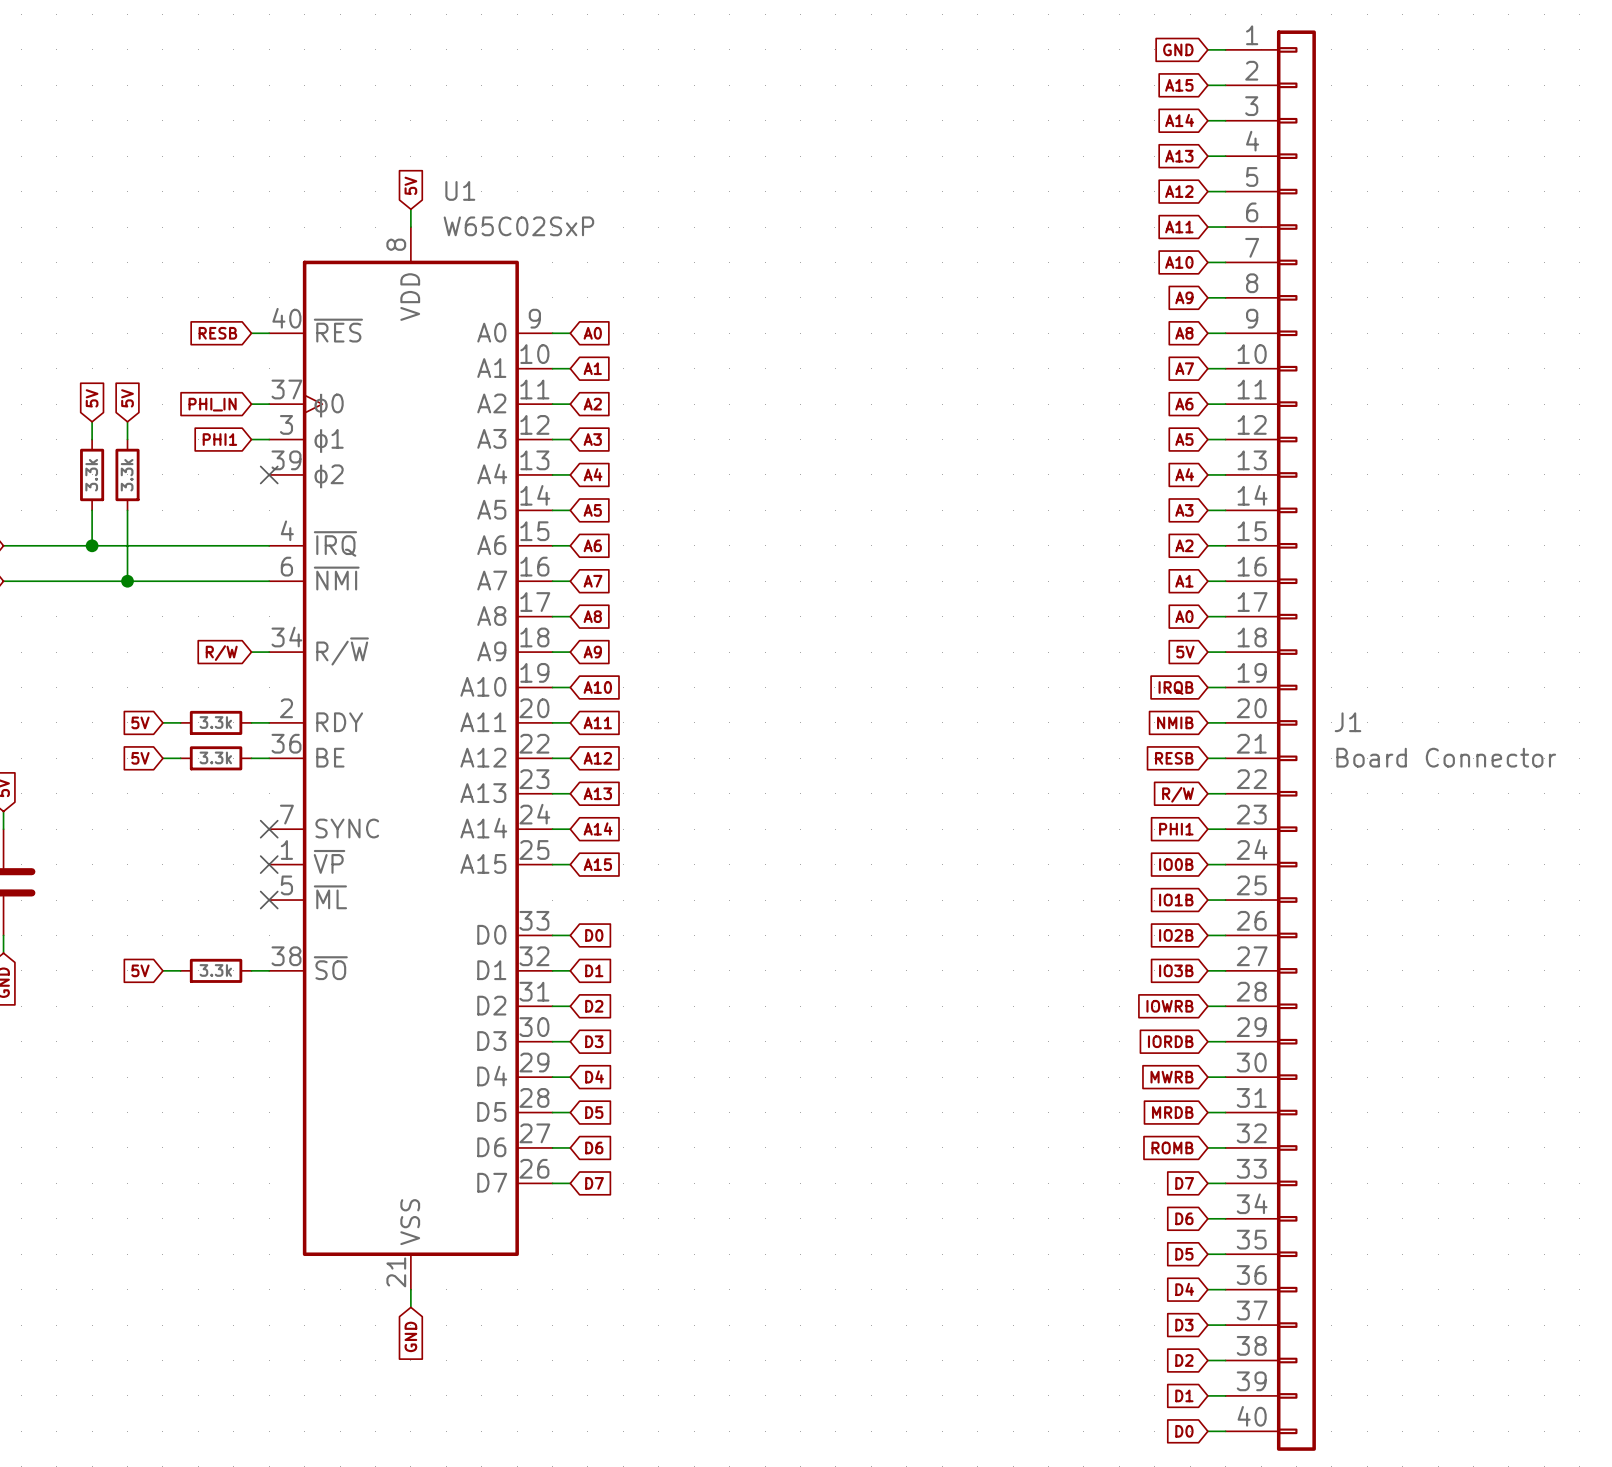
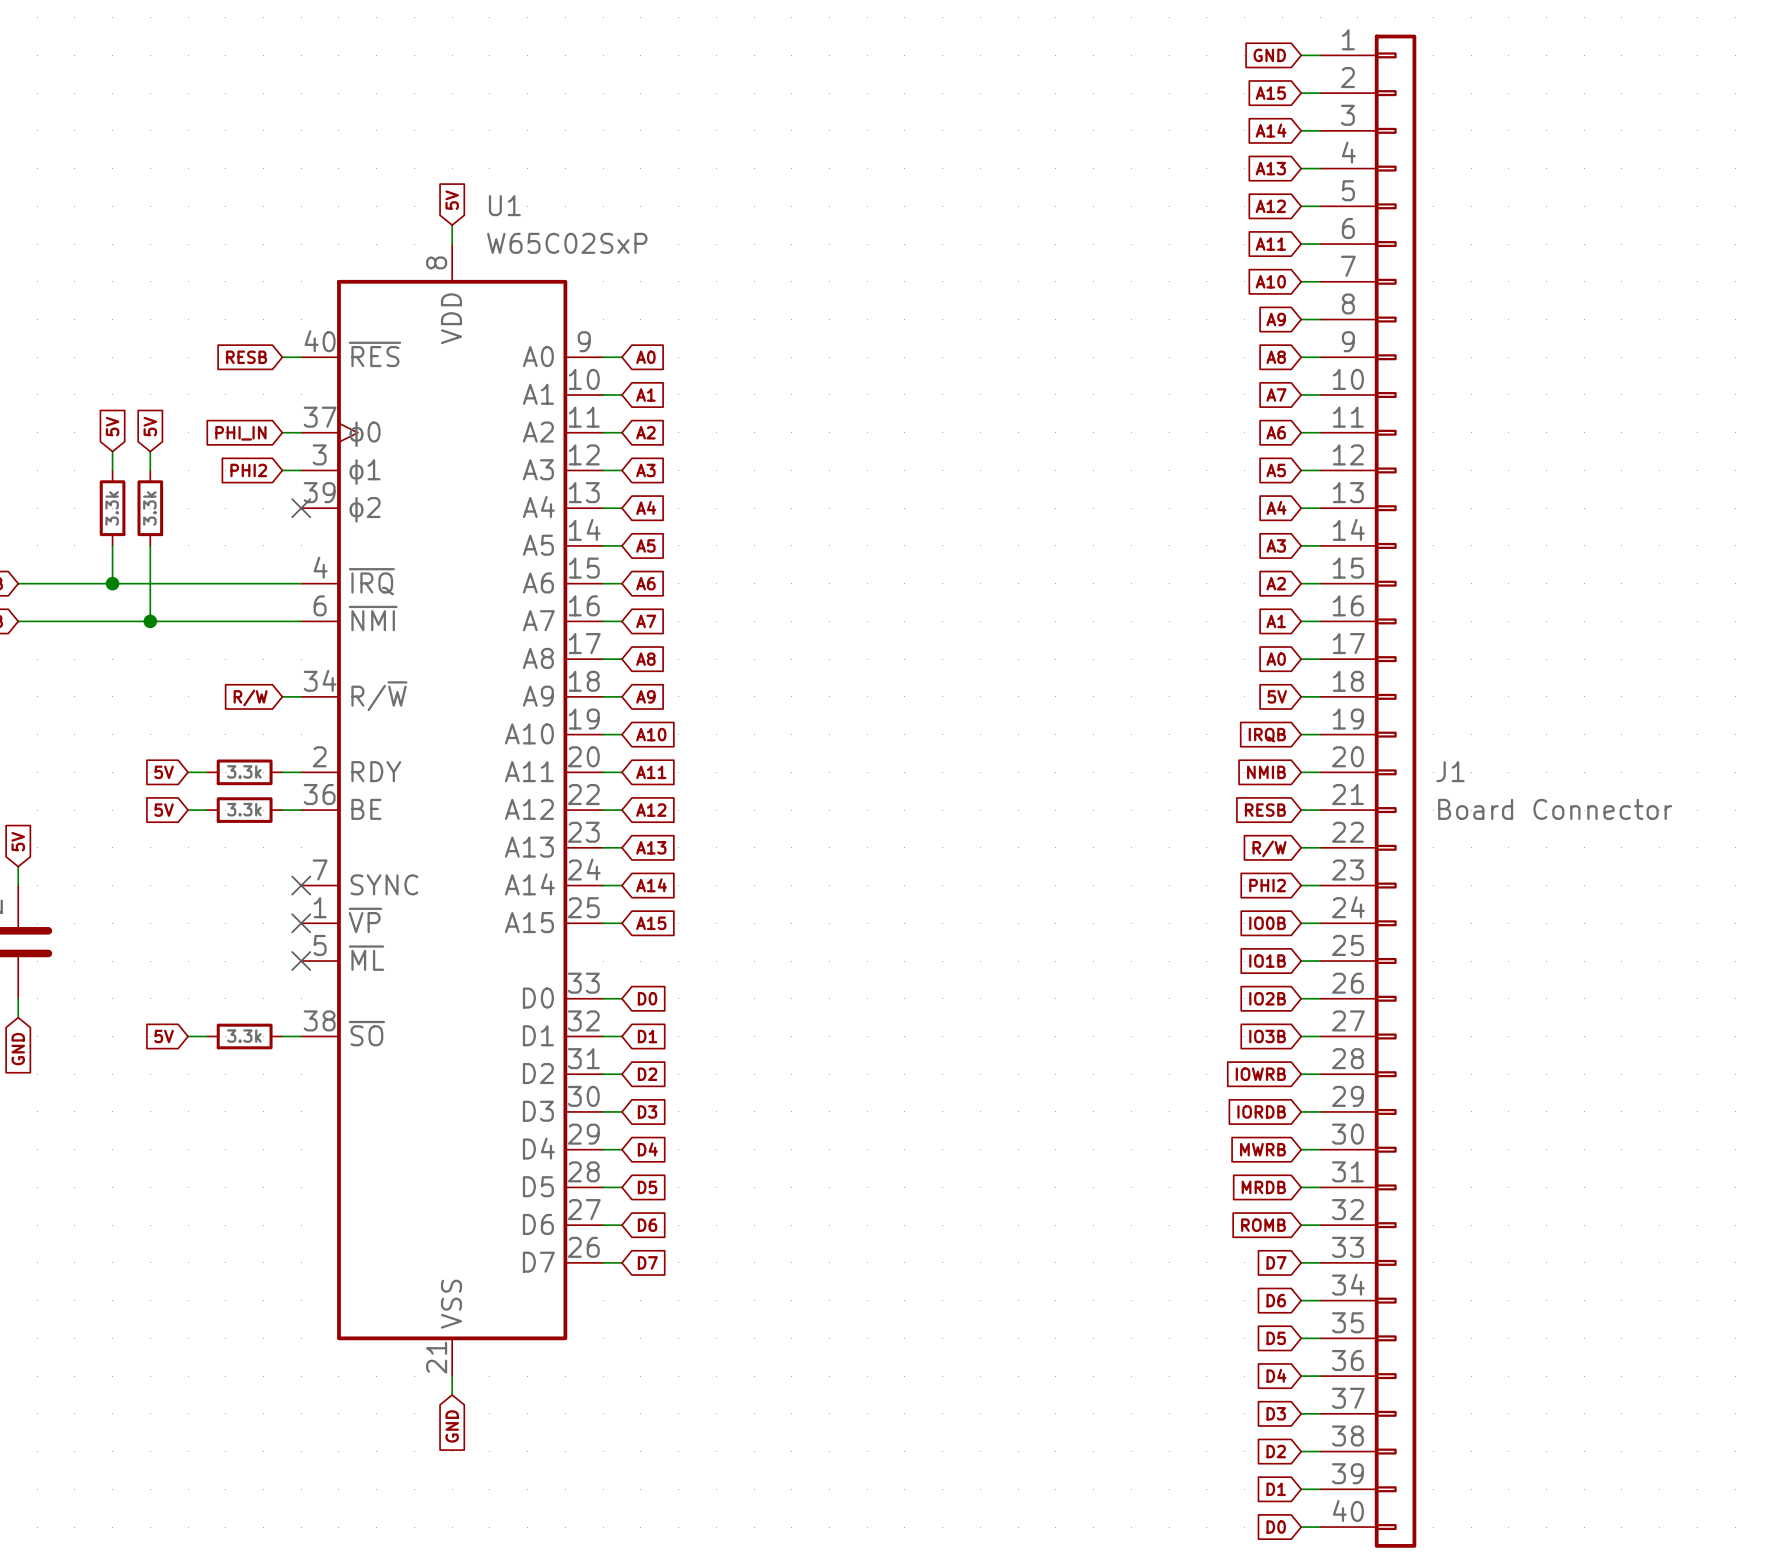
global label: PHI1 (219, 439) -> PHI2 (248, 470)
global label: PHI1 (1176, 829) -> PHI2 (1267, 885)

